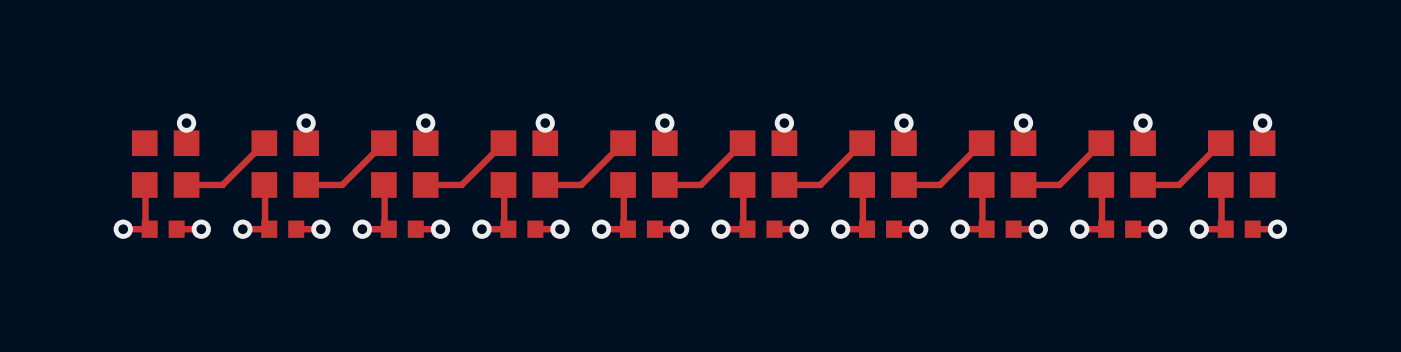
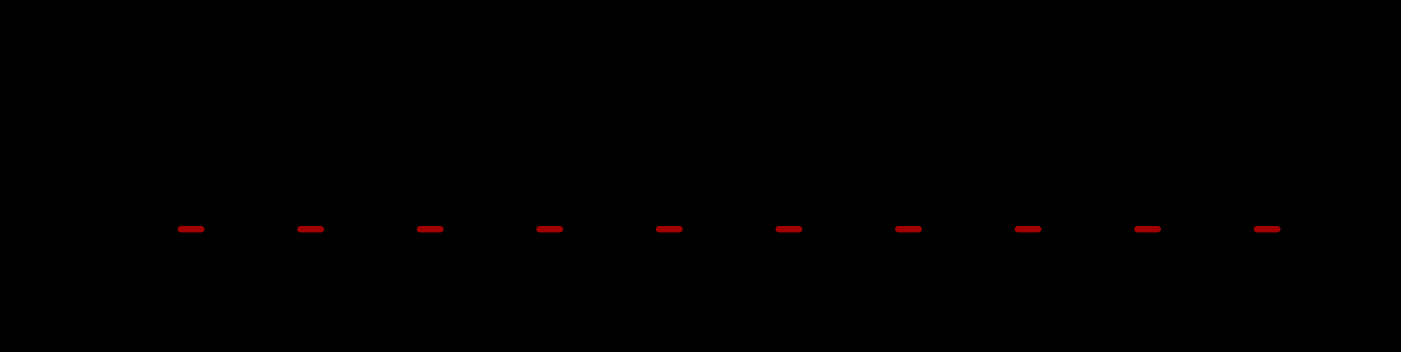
via: (186, 123) -> none
via: (306, 123) -> none
via: (425, 123) -> none
via: (545, 123) -> none
via: (664, 123) -> none
via: (784, 123) -> none
via: (903, 123) -> none
via: (1023, 123) -> none
via: (1143, 123) -> none
via: (1262, 123) -> none
top track: (264, 143) (222, 184) (186, 184) -> none
top track: (383, 143) (342, 184) (306, 184) -> none
top track: (503, 143) (461, 184) (425, 184) -> none
top track: (623, 143) (581, 184) (545, 184) -> none
top track: (742, 143) (700, 184) (664, 184) -> none
top track: (862, 143) (820, 184) (784, 184) -> none
top track: (981, 143) (939, 184) (903, 184) -> none
top track: (1101, 143) (1059, 184) (1023, 184) -> none
top track: (1220, 143) (1179, 184) (1143, 184) -> none
part: (165, 164) -> none
part: (285, 164) -> none
part: (404, 164) -> none
part: (524, 164) -> none
part: (643, 164) -> none
part: (763, 164) -> none
part: (883, 164) -> none
part: (1002, 164) -> none
part: (1122, 164) -> none
part: (1241, 164) -> none
top track: (144, 184) (145, 229) (123, 229) -> none
top track: (264, 184) (265, 229) (242, 229) -> none
top track: (383, 184) (384, 229) (362, 229) -> none
top track: (503, 184) (504, 229) (481, 229) -> none
top track: (623, 184) (623, 229) (601, 229) -> none
top track: (742, 184) (743, 229) (721, 229) -> none
top track: (862, 184) (862, 229) (840, 229) -> none
top track: (981, 184) (982, 229) (960, 229) -> none
top track: (1101, 184) (1102, 229) (1079, 229) -> none
top track: (1220, 184) (1221, 229) (1199, 229) -> none
via: (123, 229) -> none
part: (163, 229) -> none
via: (201, 229) -> none
via: (242, 229) -> none
part: (282, 229) -> none
via: (320, 229) -> none
via: (362, 229) -> none
part: (402, 229) -> none
via: (440, 229) -> none
via: (481, 229) -> none
part: (521, 229) -> none
via: (560, 229) -> none
via: (601, 229) -> none
part: (641, 229) -> none
via: (679, 229) -> none
via: (721, 229) -> none
part: (760, 229) -> none
via: (799, 229) -> none
via: (840, 229) -> none
part: (880, 229) -> none
via: (918, 229) -> none
via: (960, 229) -> none
part: (1000, 229) -> none
via: (1038, 229) -> none
via: (1079, 229) -> none
part: (1119, 229) -> none
via: (1157, 229) -> none
via: (1199, 229) -> none
part: (1239, 229) -> none
via: (1277, 229) -> none

